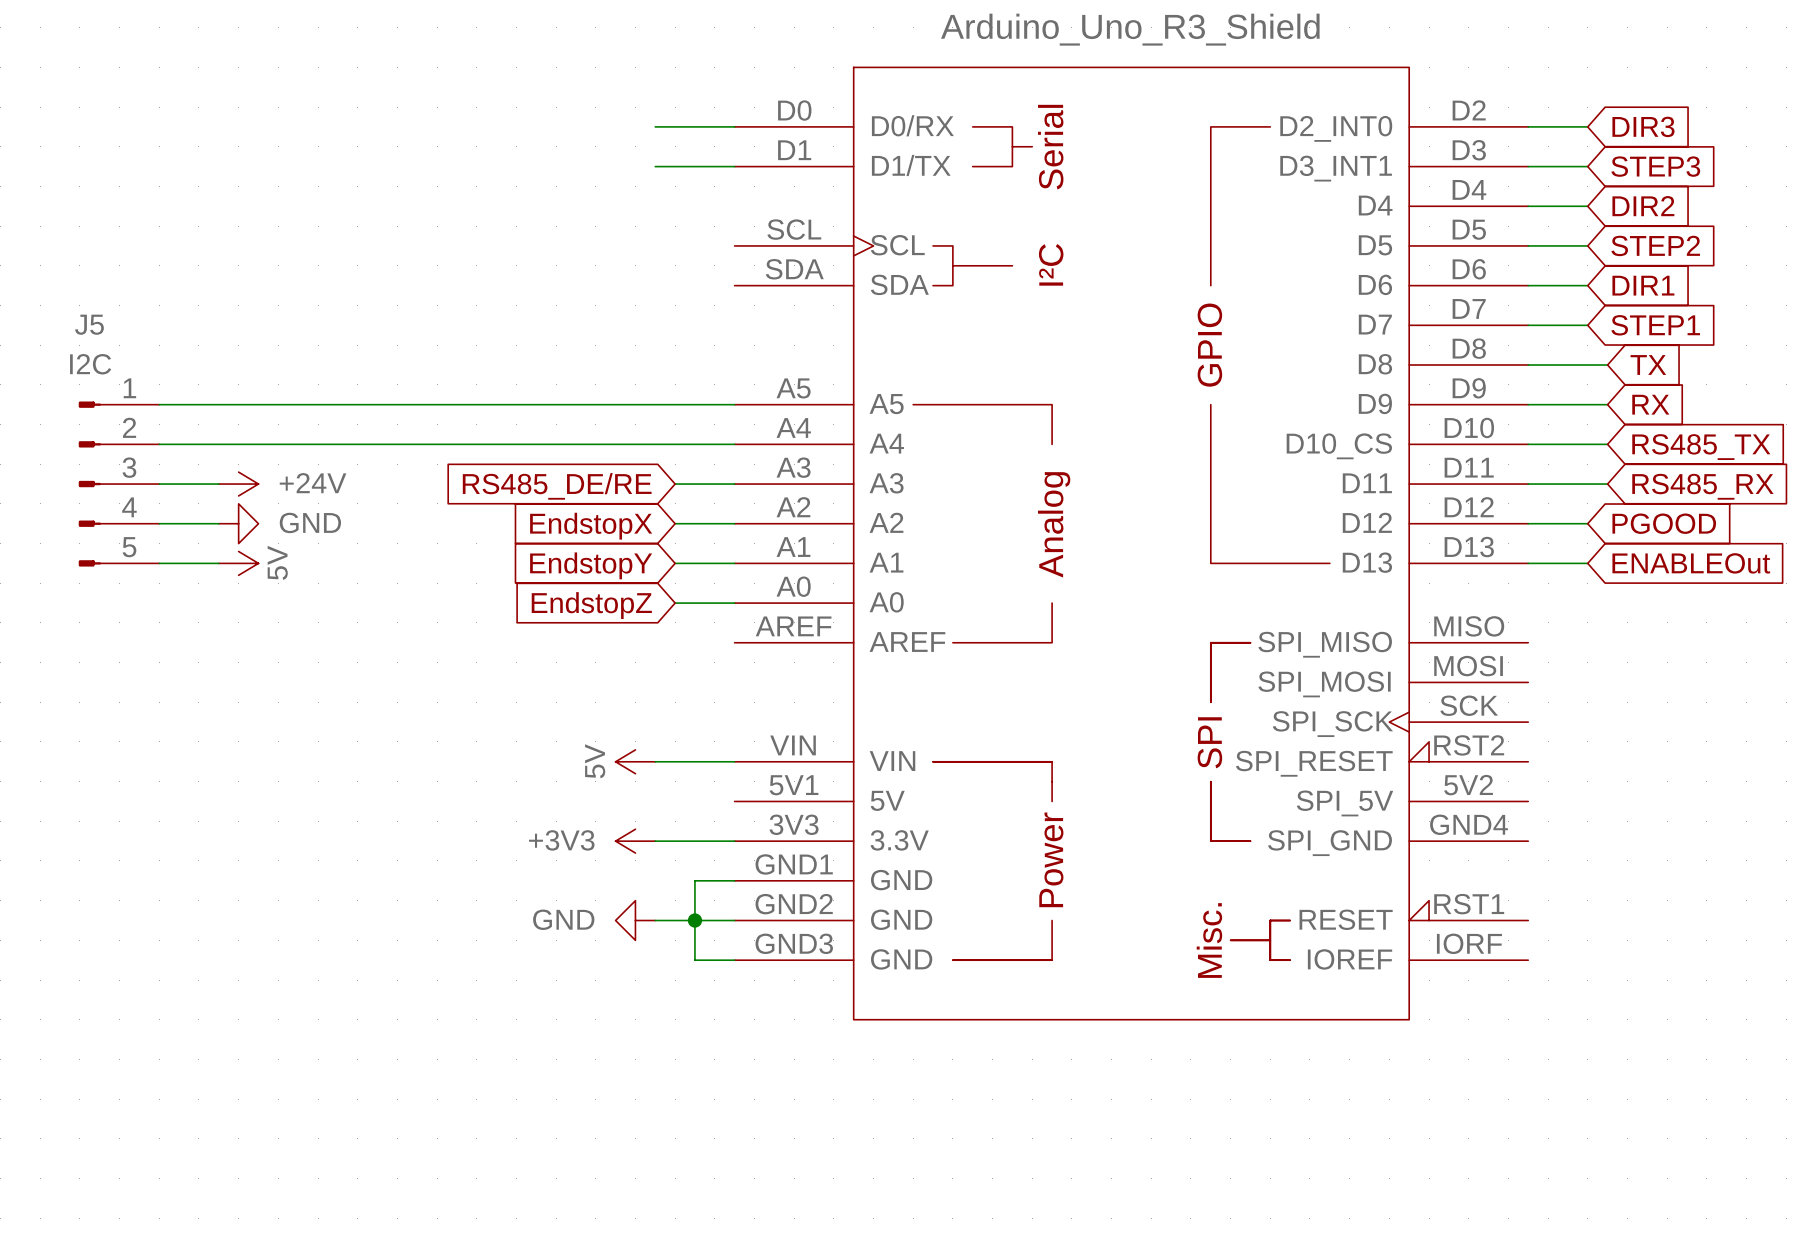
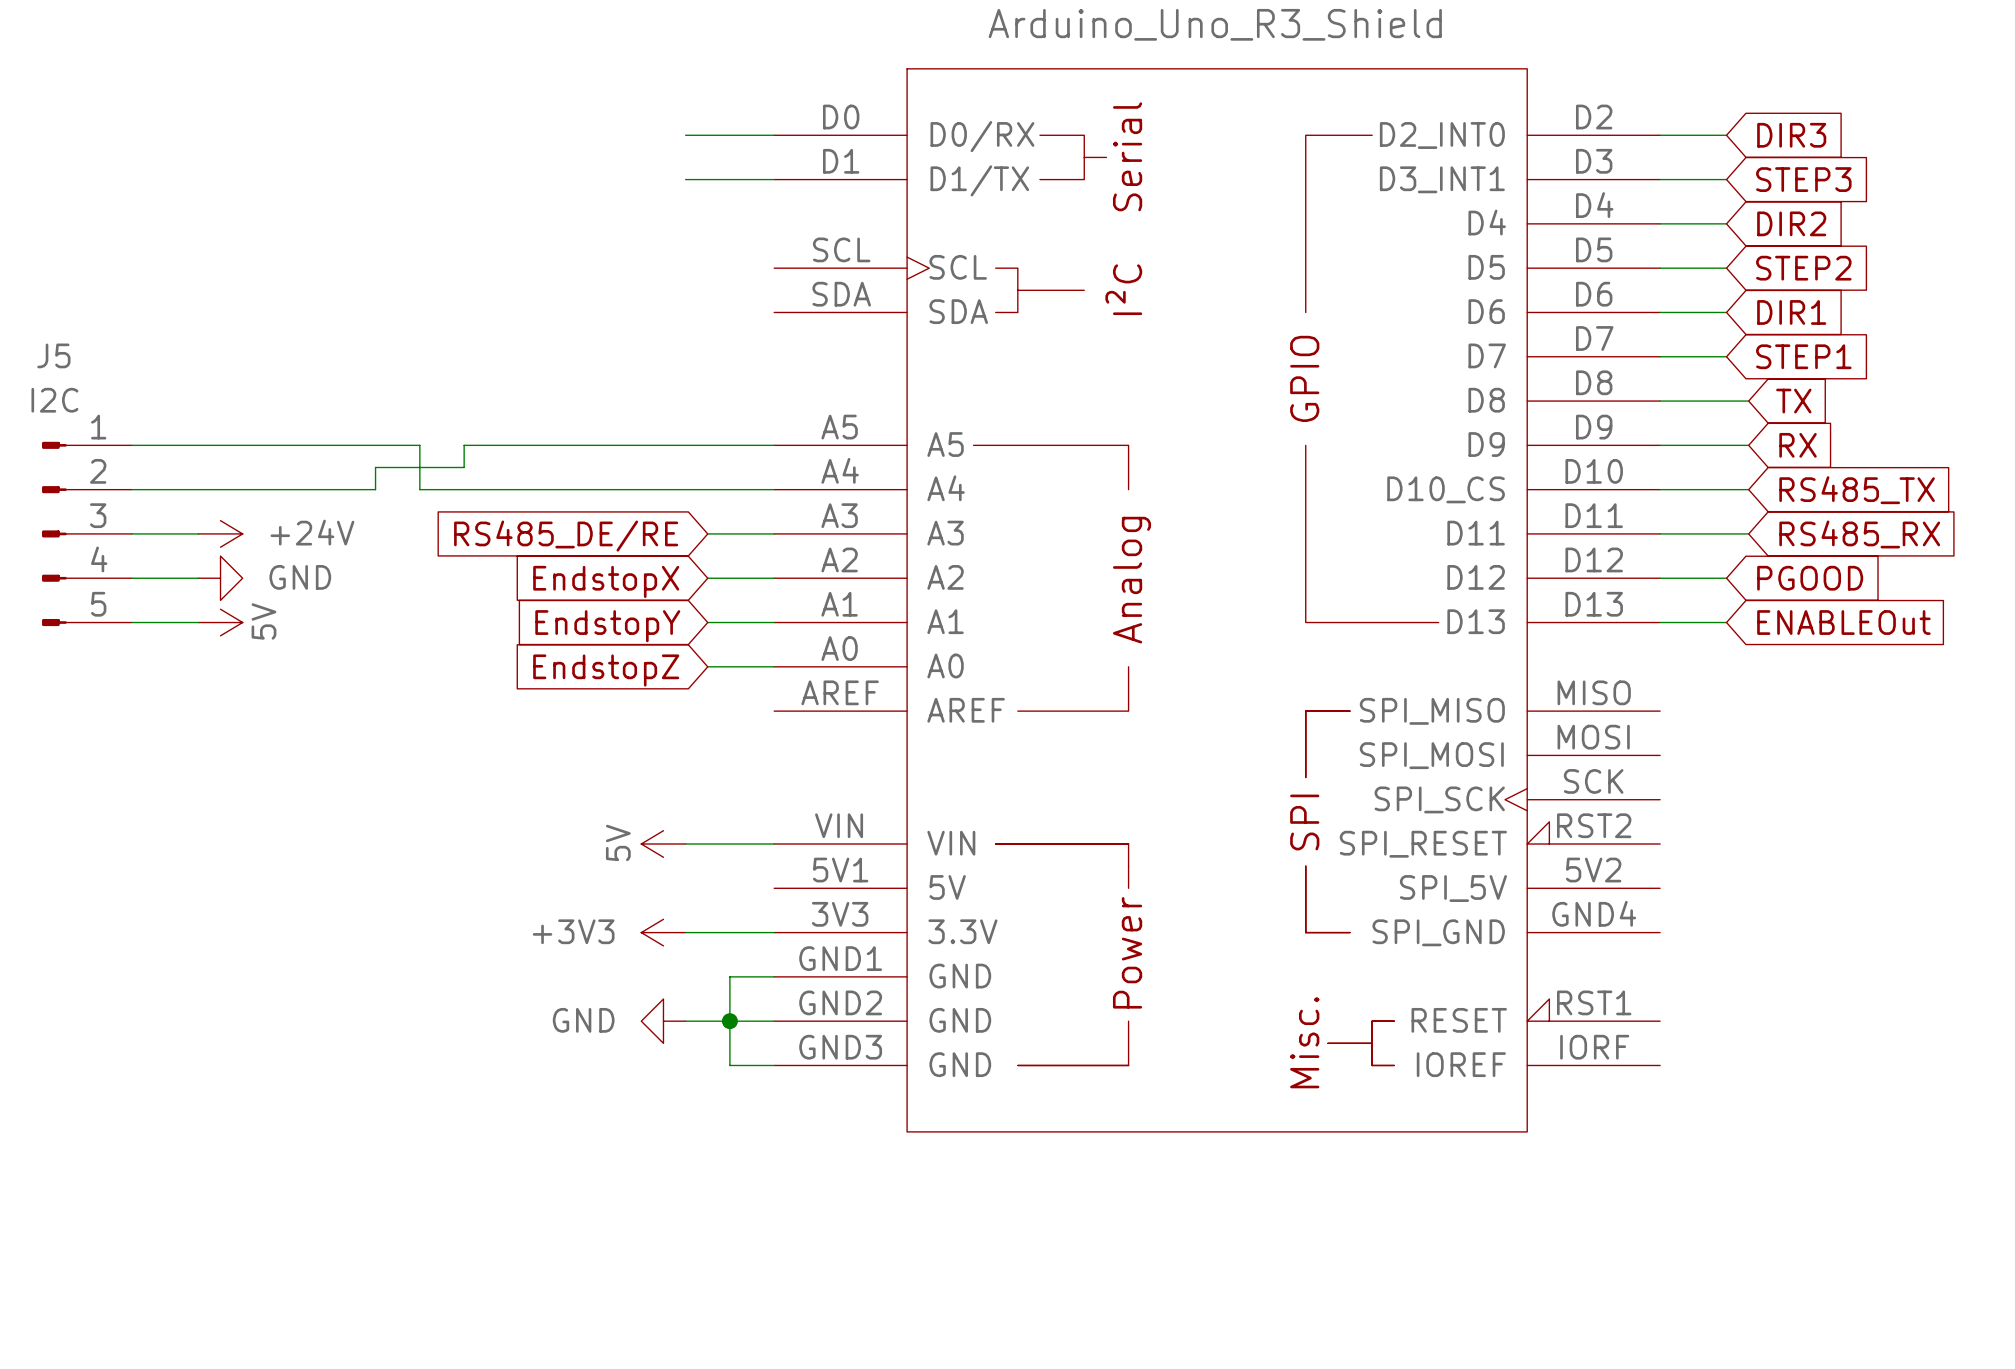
wire: (417, 404) (456, 404) -> (375, 489) (375, 467) (464, 467) (464, 445)
wire: (377, 444) (417, 444) -> (419, 445) (419, 489)

